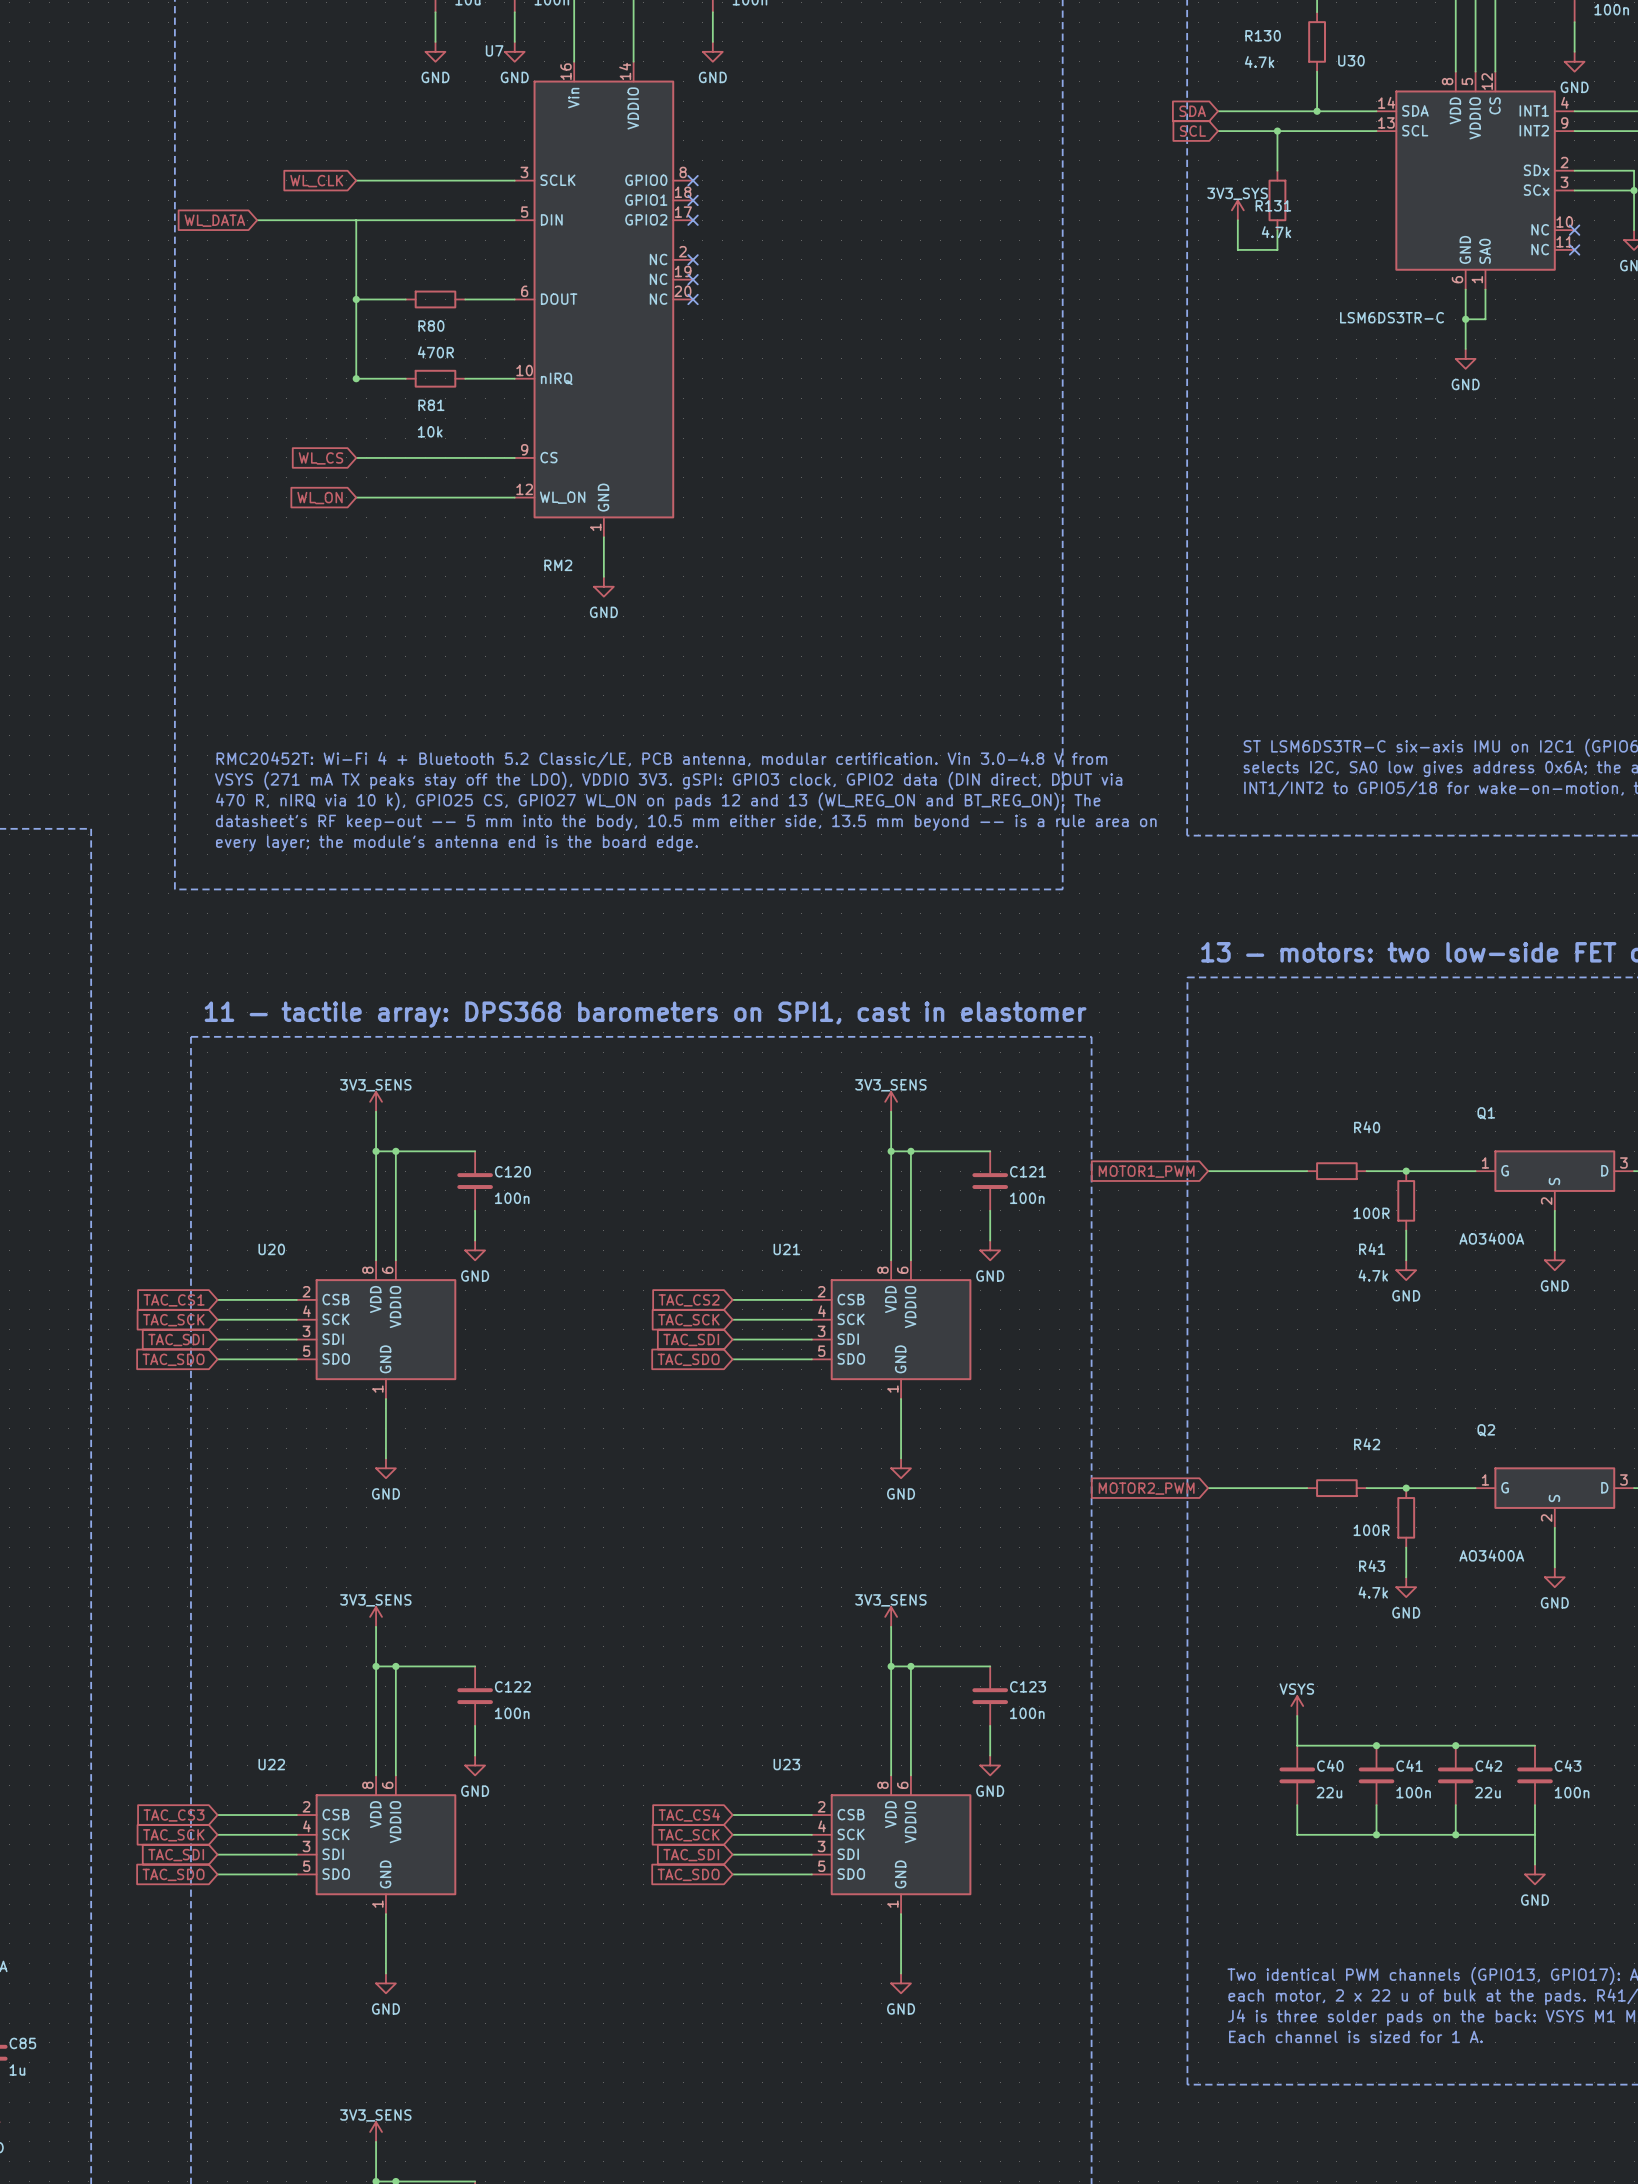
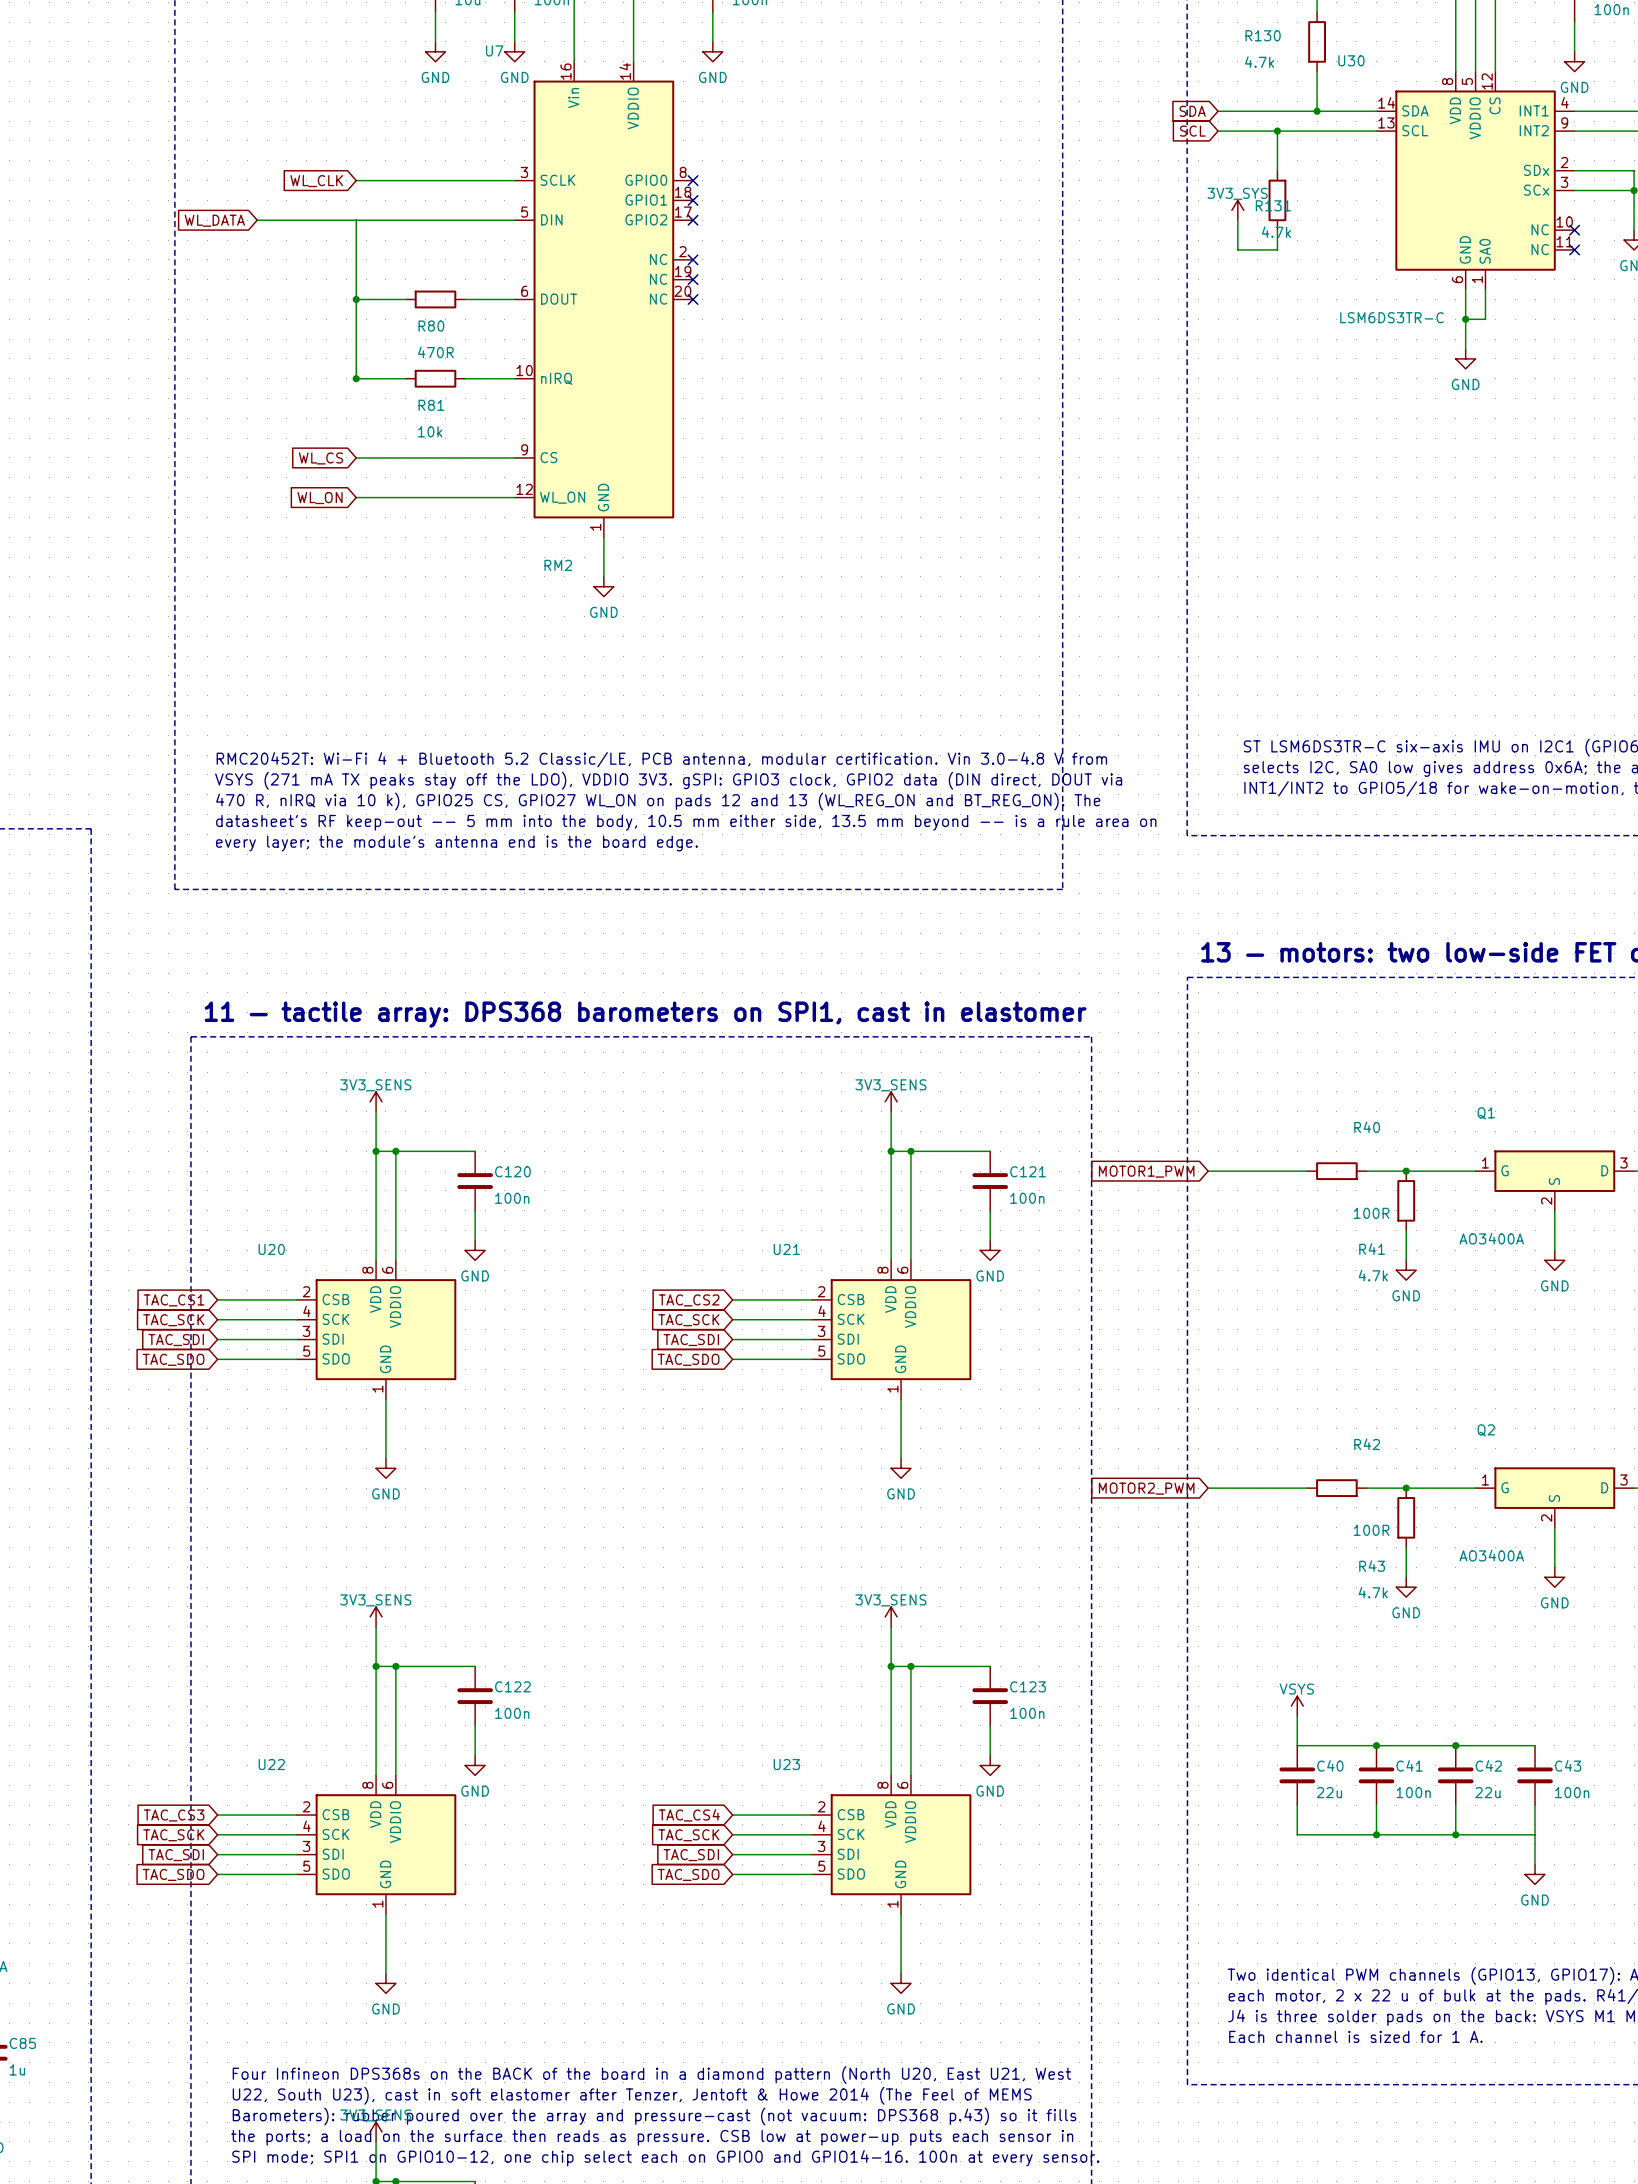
text: none -> Four Infineon DPS368s on the BACK of the board in a diamond pattern (North U20, East U21, West (651, 2075)
text: none -> U22, South U23), cast in soft elastomer after Tenzer, Jentoft & Howe 2014 (The Feel of MEMS (632, 2095)
text: none -> Barometers): rubber poured over the array and pressure-cast (not vacuum: DPS368 p.43) so it fills (654, 2116)
text: none -> the ports; a load on the surface then reads as pressure. CSB low at power-up puts each sensor in (652, 2137)
text: none -> SPI mode; SPI1 on GPIO10-12, one chip select each on GPIO0 and GPIO14-16. 100n at every sensor. (665, 2158)

